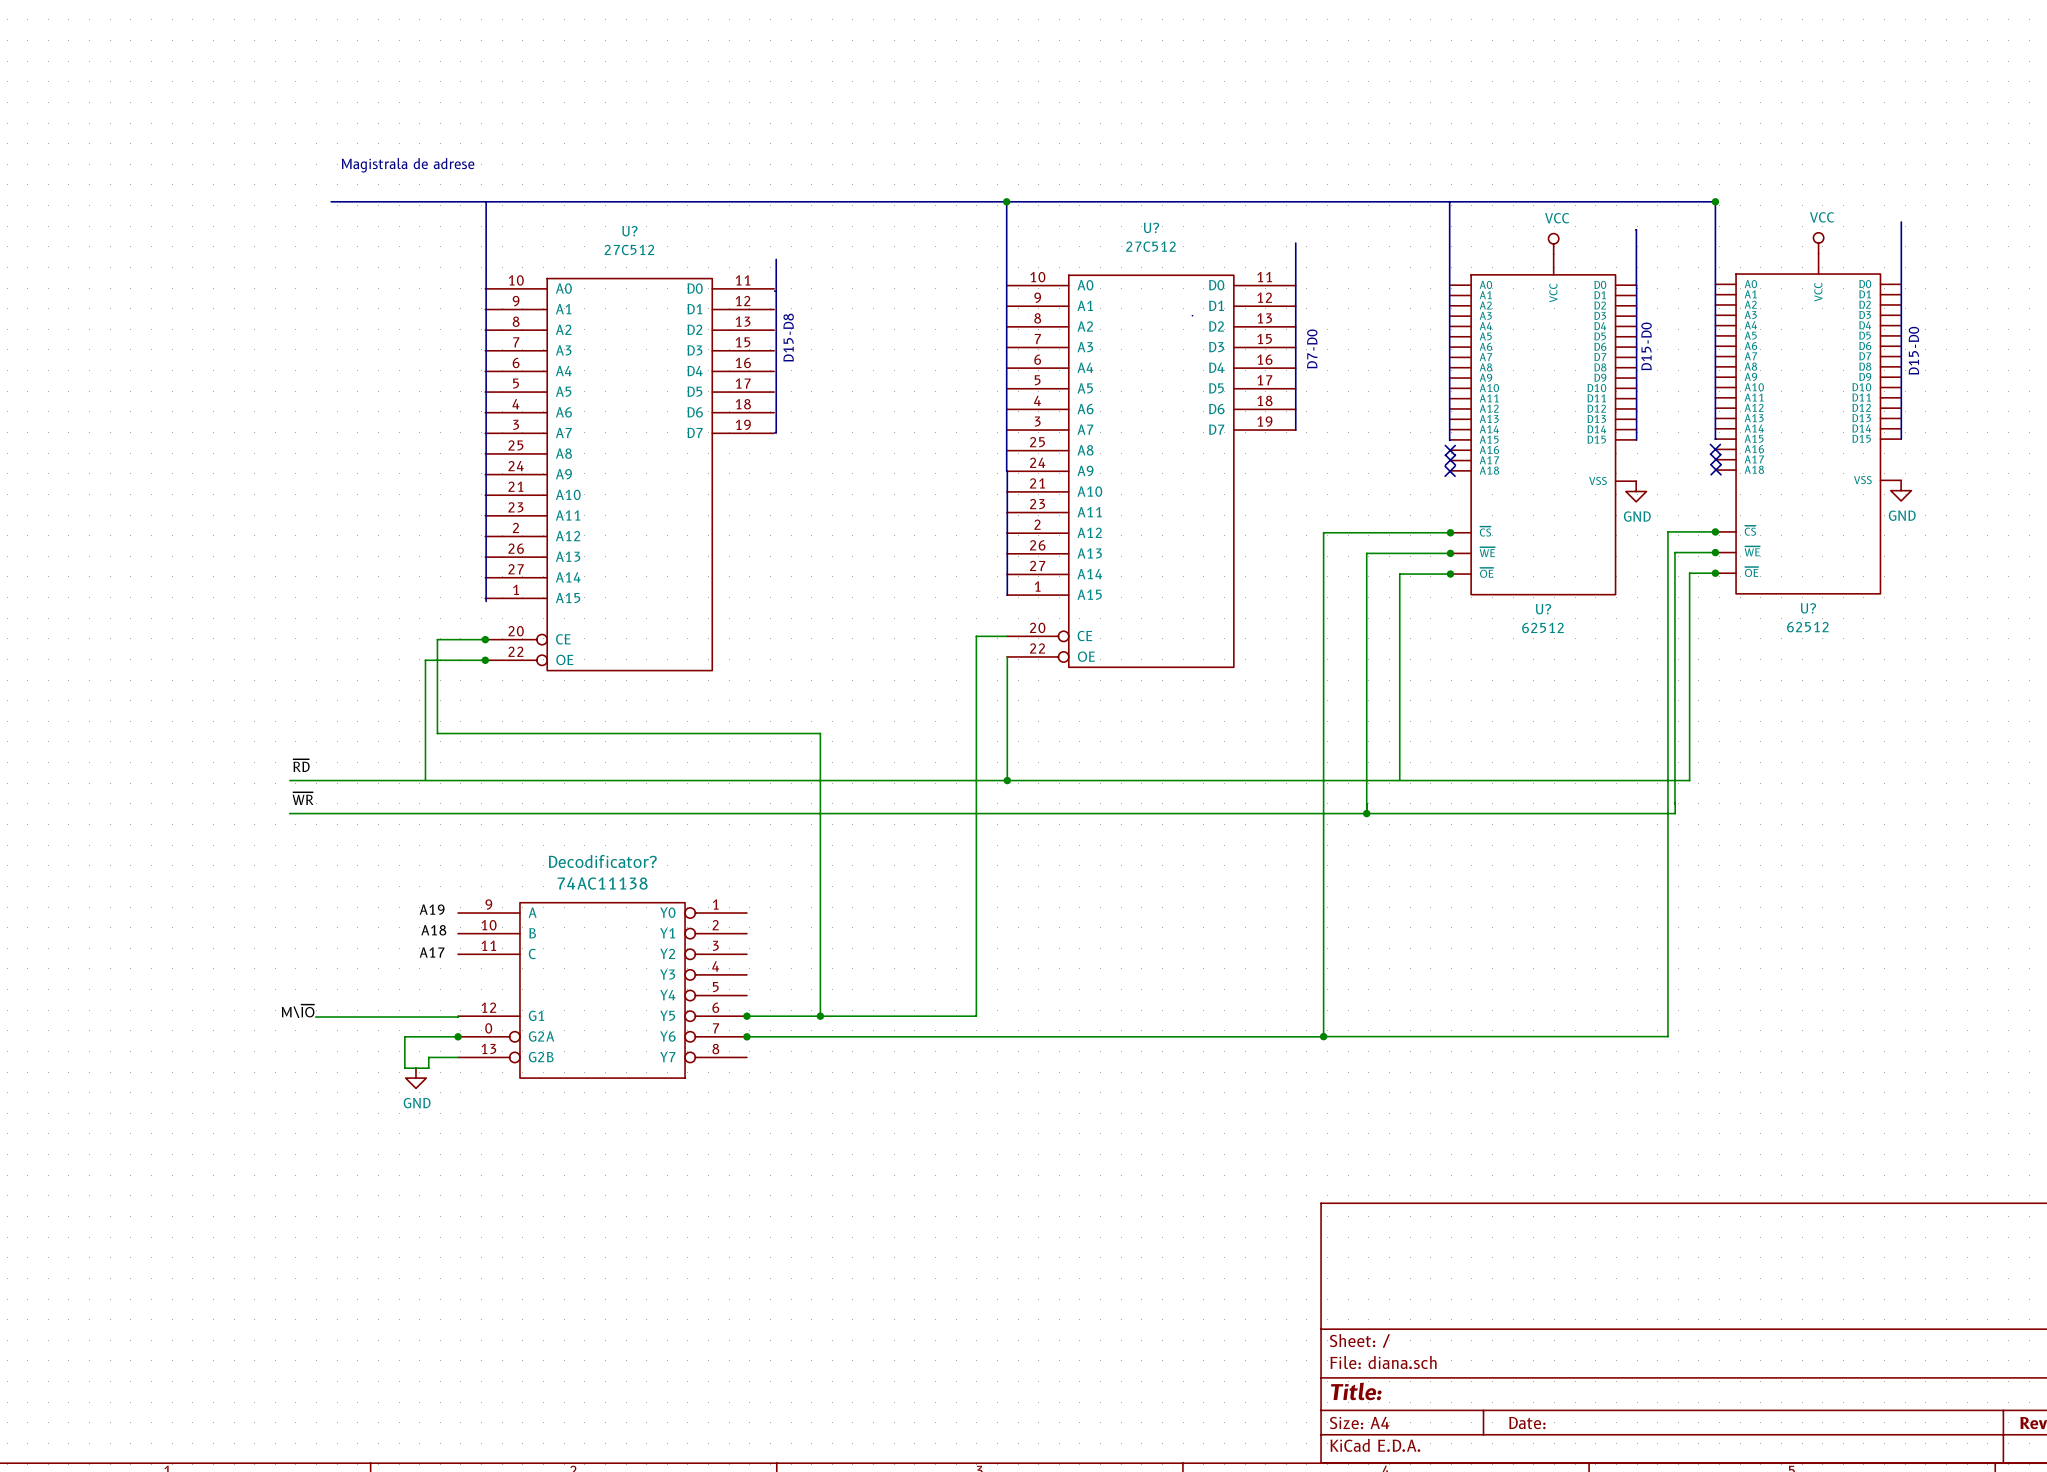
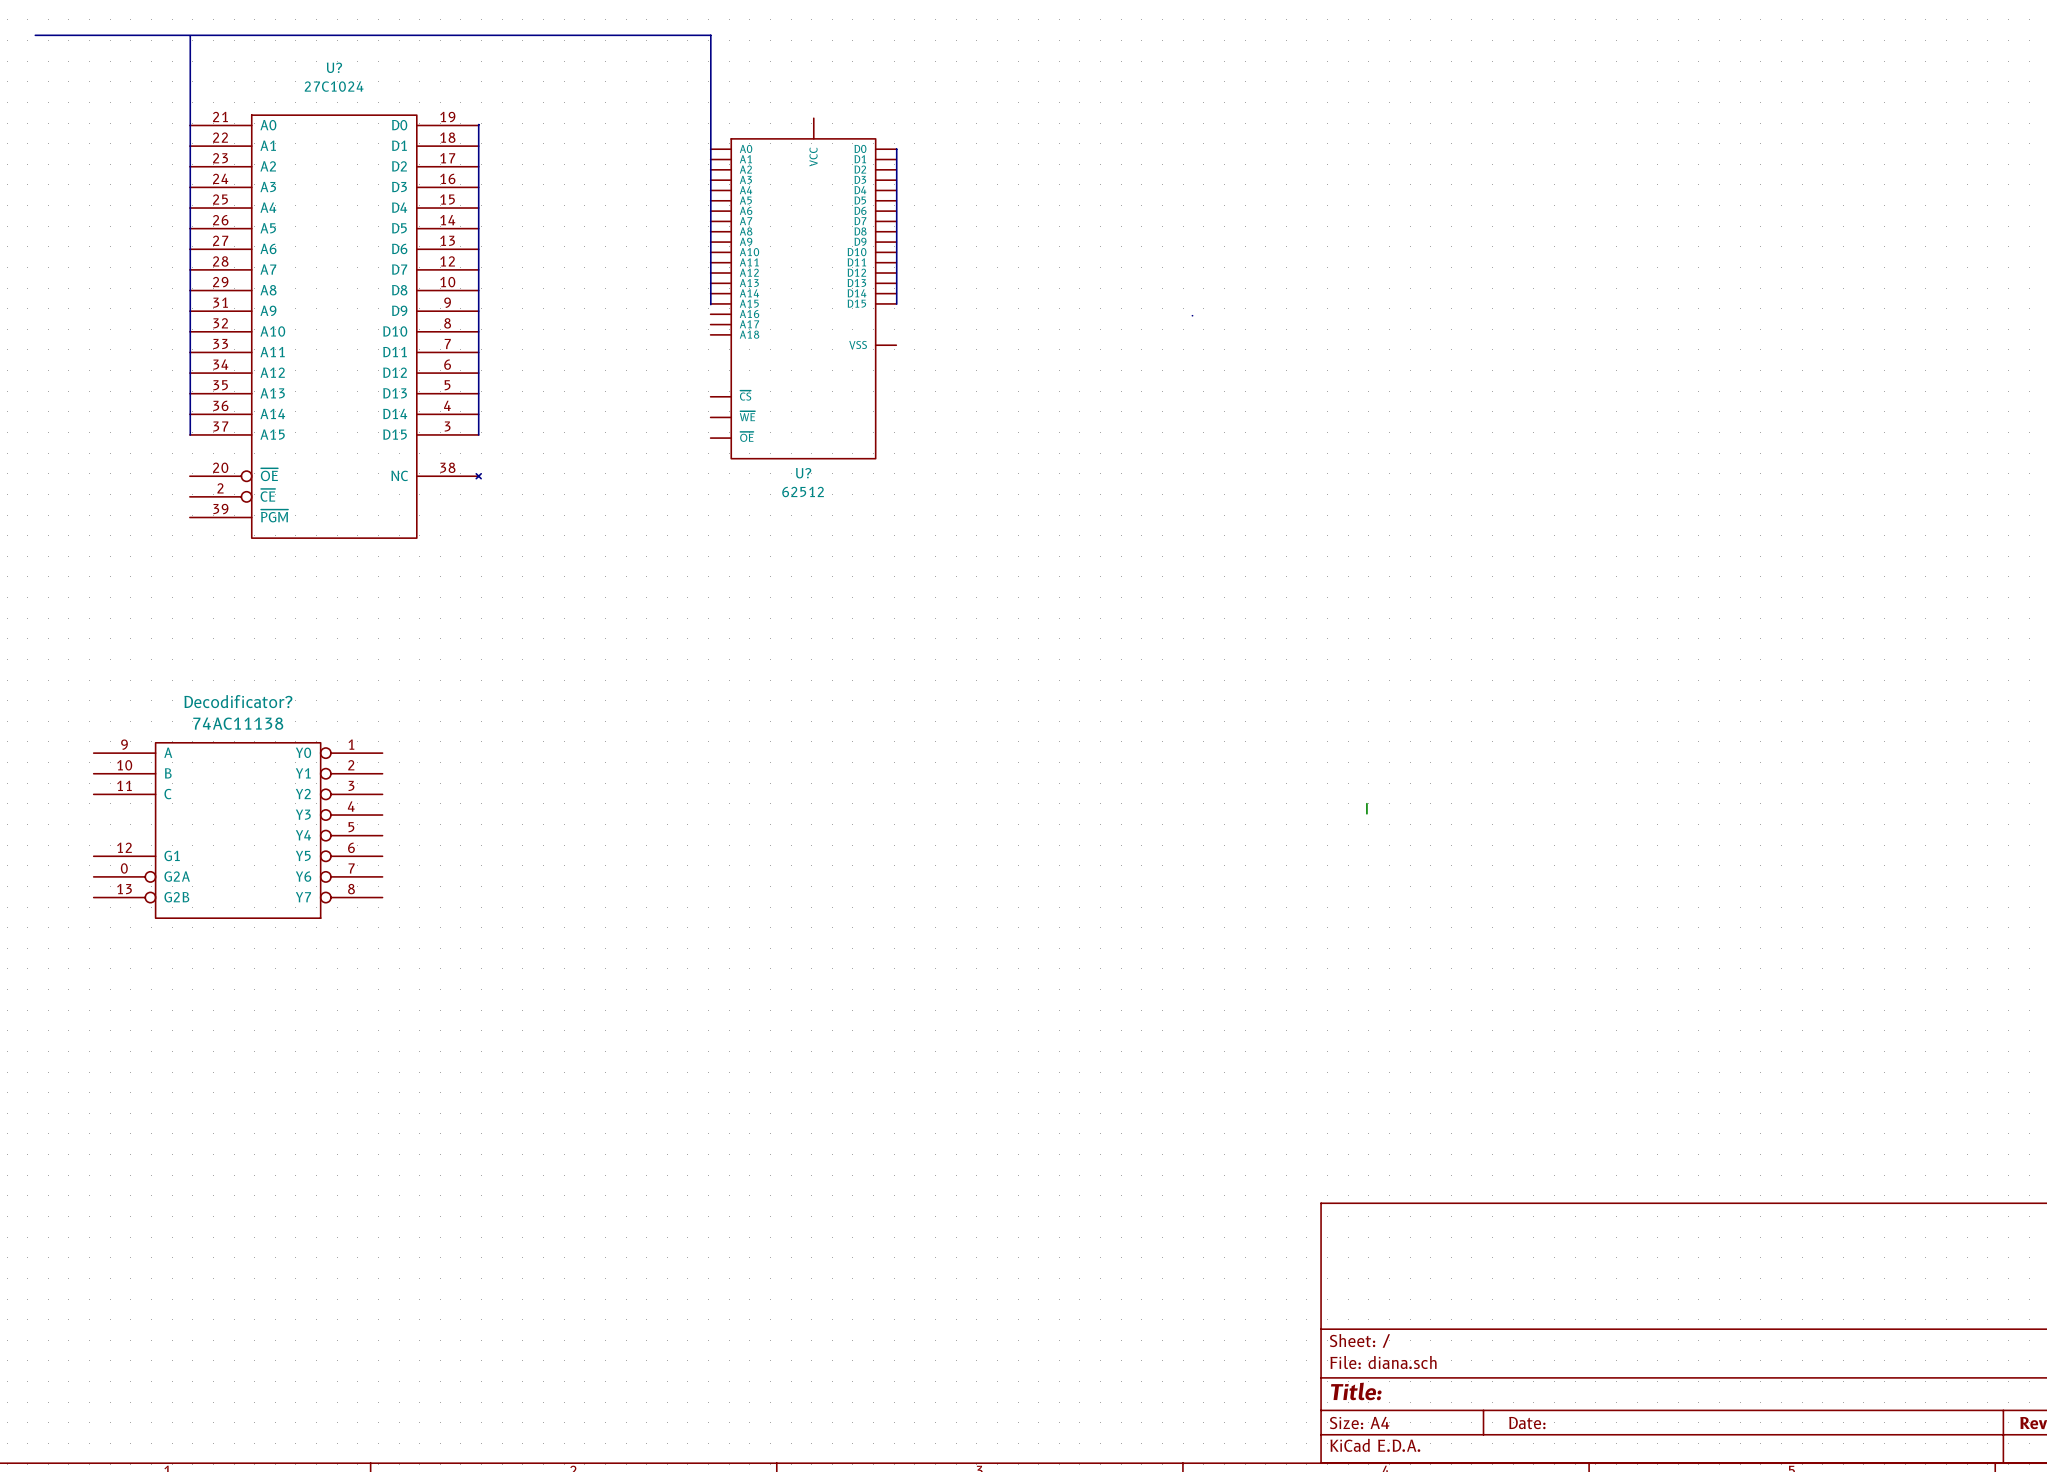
bus: none -> (35, 35) (710, 35) (710, 304)
bus: none -> (190, 36) (190, 434)
bus: none -> (478, 124) (478, 434)
bus: none -> (896, 149) (896, 304)
text: Magistrala de adrese (408, 165) -> none
bus: (331, 201) (1715, 201) -> none
bus: (1006, 201) (1006, 471) -> none
junction: (1006, 201) -> none
bus: (1449, 201) (1449, 440) -> none
bus: (1715, 201) (1716, 439) -> none
junction: (1715, 201) -> none
bus: (486, 202) (486, 601) -> none
bus: (1901, 222) (1901, 439) -> none
bus: (1635, 229) (1636, 285) -> none
bus: (1295, 243) (1295, 430) -> none
power symbol: VCC (1553, 243) -> none
power symbol: VCC (1818, 243) -> none
bus: (776, 259) (774, 432) -> none
bus: (1636, 285) (1636, 440) -> none
U?: none -> 62512 (803, 288)
bus: (774, 291) (774, 291) -> none
U?: none -> 27C1024 (335, 326)
text: D15-D8 (788, 337) -> none
text: D15-D0 (1646, 346) -> none
text: D7-D0 (1312, 348) -> none
text: D15-D0 (1913, 350) -> none
U?: 62512 (1808, 423) -> none
U?: 62512 (1543, 424) -> none
no-connect mark: (1715, 449) -> none
no-connect mark: (1450, 450) -> none
no-connect mark: (1716, 459) -> none
no-connect mark: (1450, 460) -> none
no-connect mark: (1716, 469) -> none
bus: (1007, 471) (1007, 595) -> none
U?: 27C512 (1151, 471) -> none
no-connect mark: (1450, 471) -> none
U?: 27C512 (629, 474) -> none
power symbol: GND (1901, 490) -> none
power symbol: GND (1636, 491) -> none
wire: (1715, 531) (1667, 531) (1667, 1036) (1323, 1036) -> none
junction: (1715, 531) -> none
wire: (1450, 532) (1323, 532) (1323, 1036) (746, 1036) -> none
junction: (1450, 532) -> none
junction: (1715, 552) -> none
wire: (1716, 552) (1674, 552) (1674, 803) -> none
wire: (1450, 553) (1366, 553) (1366, 813) -> none
junction: (1450, 553) -> none
junction: (1715, 573) -> none
wire: (1716, 573) (1689, 573) (1689, 780) (289, 780) -> none
wire: (1450, 574) (1399, 574) (1399, 780) -> none
junction: (1450, 574) -> none
wire: (1006, 636) (976, 636) (976, 1016) (746, 1016) -> none
wire: (485, 639) (437, 639) (437, 733) (820, 733) (820, 1016) -> none
junction: (485, 639) -> none
wire: (1007, 656) (1007, 780) -> none
wire: (485, 660) (425, 660) (425, 780) -> none
junction: (485, 660) -> none
label: ~{RD} (301, 765) -> none
junction: (1007, 780) -> none
label: ~{WR} (303, 798) -> none
wire: (1674, 803) (1675, 813) (289, 813) -> none
junction: (1366, 813) -> none
Decodificator?: none -> 74AC11138 (238, 830)
label: A19 (432, 909) -> none
label: A18 (433, 930) -> none
label: A17 (432, 952) -> none
Decodificator?: 74AC11138 (602, 990) -> none
label: M\~{IO} (298, 1011) -> none
wire: (458, 1016) (315, 1017) -> none
junction: (746, 1016) -> none
junction: (820, 1016) -> none
wire: (458, 1036) (404, 1036) (404, 1068) (428, 1068) (428, 1057) (458, 1057) -> none
junction: (458, 1036) -> none
junction: (746, 1036) -> none
junction: (1323, 1036) -> none
power symbol: GND (415, 1078) -> none

